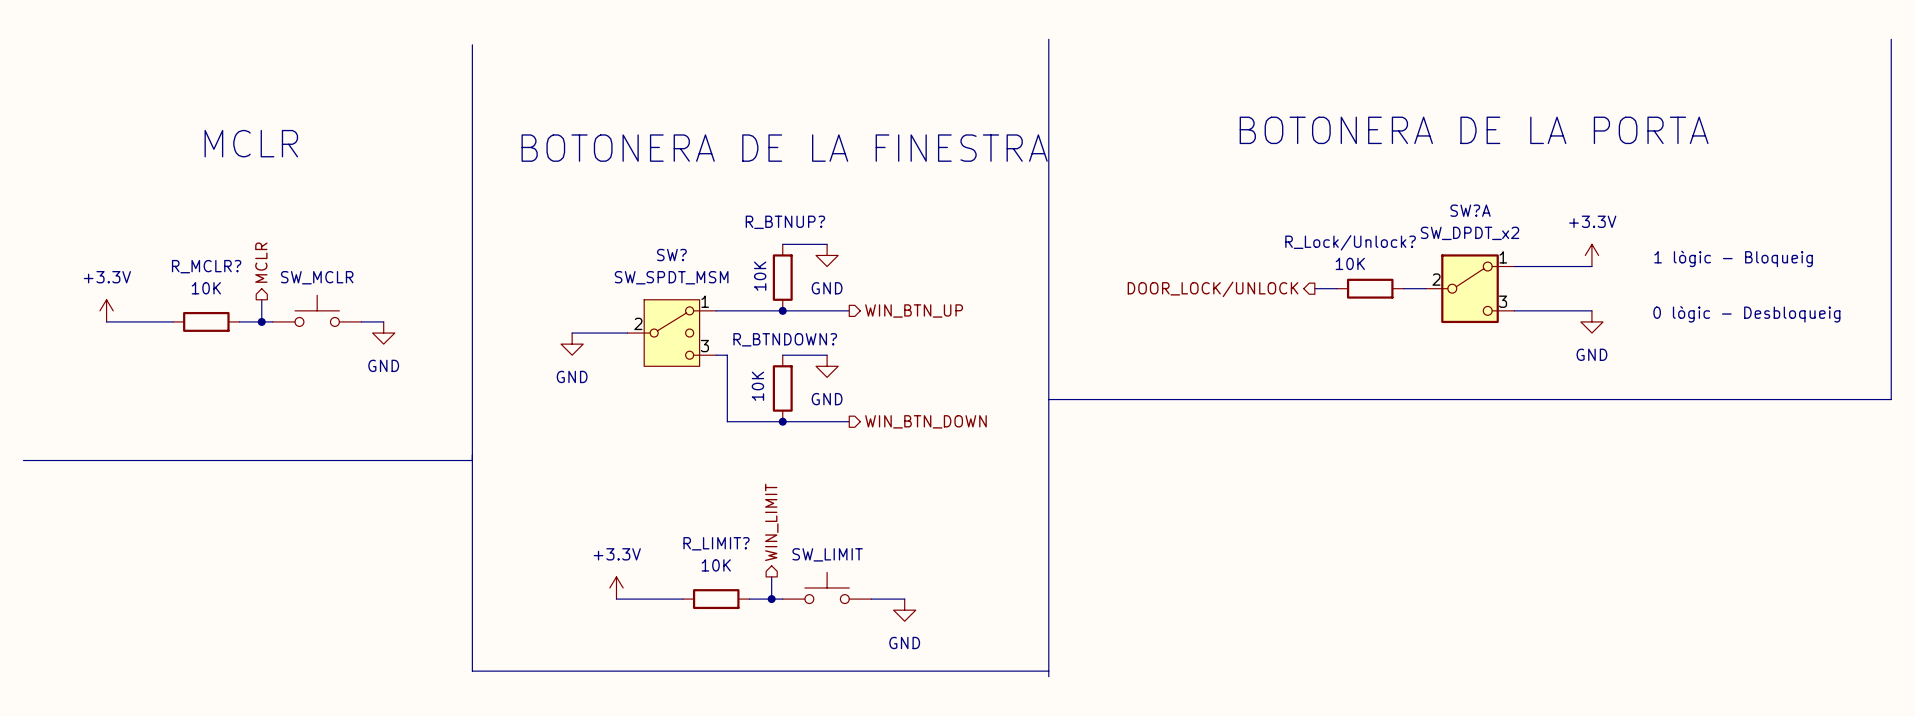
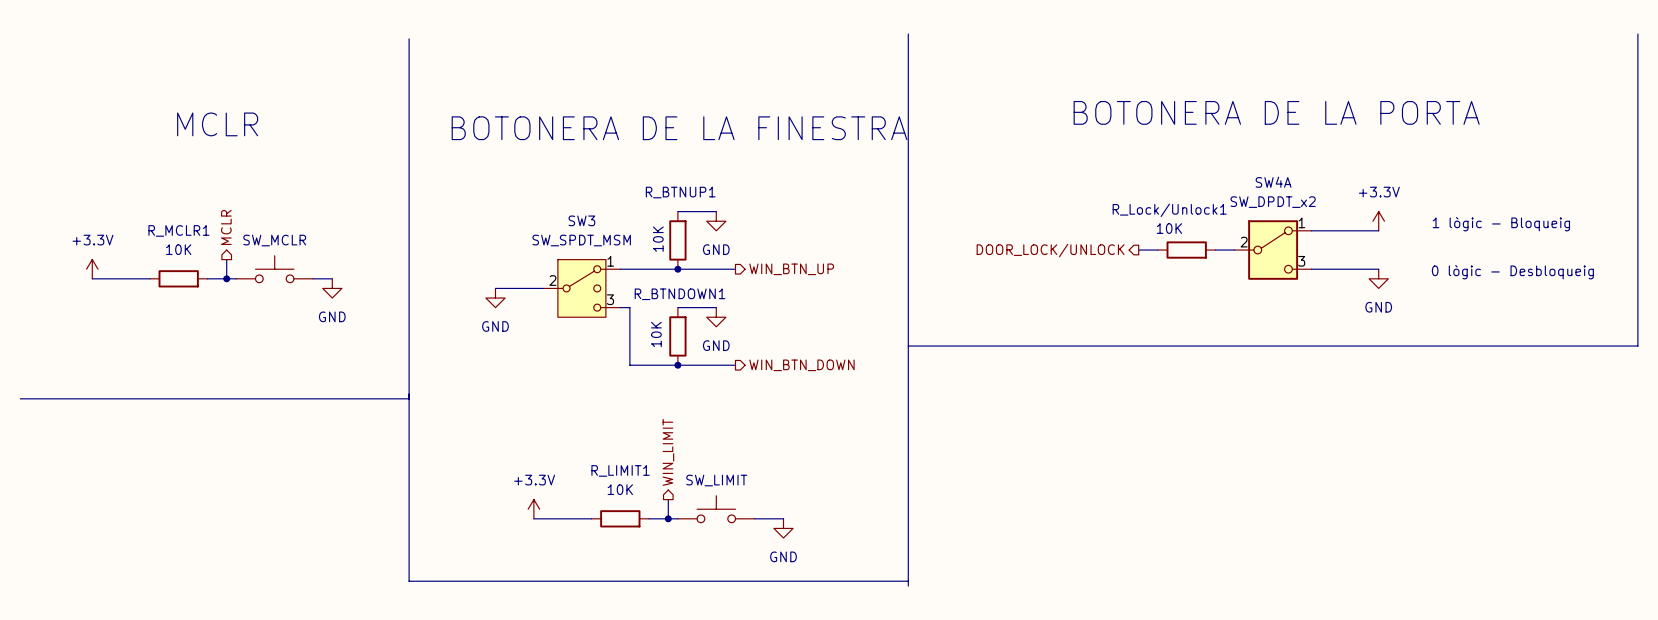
SW?A name: SW?A (1470, 210) -> SW4A (1273, 182)
R_BTNUP? name: R_BTNUP? (785, 222) -> R_BTNUP1 (680, 192)
R_Lock/Unlock? name: R_Lock/Unlock? (1350, 242) -> R_Lock/Unlock1 (1169, 210)
SW? name: SW? (671, 255) -> SW3 (581, 220)
R_MCLR? name: R_MCLR? (206, 266) -> R_MCLR1 (178, 230)
R_BTNDOWN? name: R_BTNDOWN? (785, 339) -> R_BTNDOWN1 (680, 294)
R_LIMIT? name: R_LIMIT? (716, 543) -> R_LIMIT1 (620, 470)

